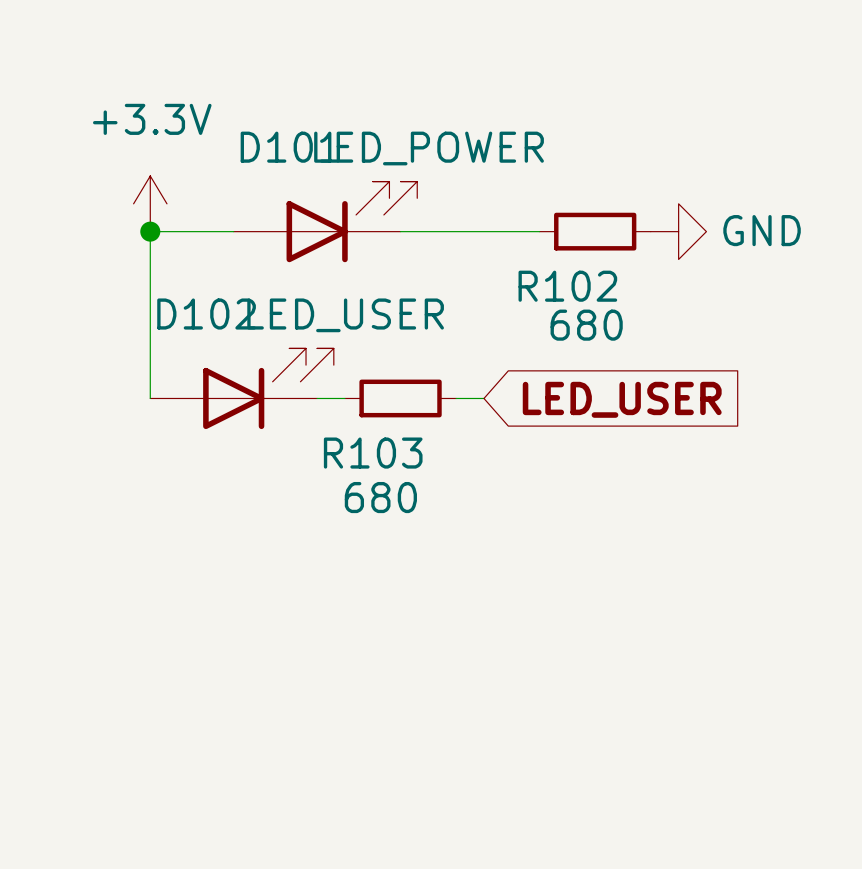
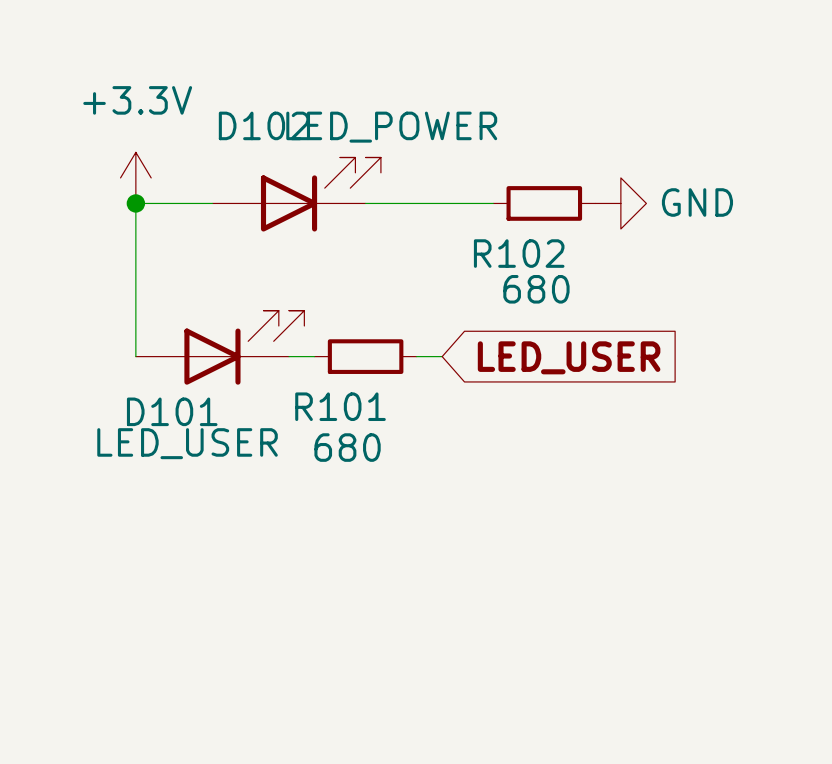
D101 name: D101 (289, 147) -> D102 (264, 125)
D102 name: D102 (206, 314) -> D101 (172, 411)
D102 value position: LED_USER (345, 315) -> LED_USER (187, 443)
R103 name: R103 (373, 453) -> R101 (340, 406)

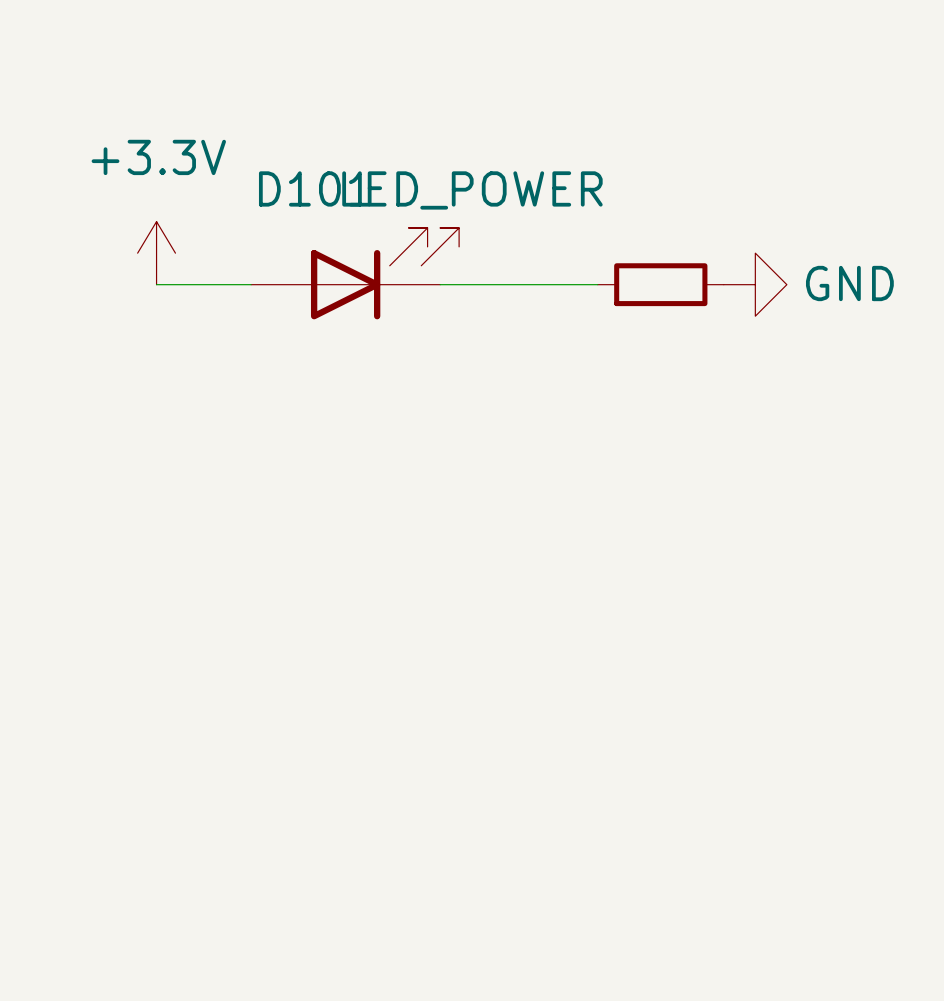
D102 name: D102 (264, 125) -> D101 (314, 188)
wire: (135, 203) (135, 356) -> none
junction: (135, 203) -> none
R102 name: R102 (519, 253) -> none
R102 value: 680 (536, 289) -> none
D101: LED_USER (220, 347) -> none
wire: (289, 356) (314, 356) -> none
R101: 680 (365, 356) -> none
wire: (416, 356) (442, 356) -> none
global label: LED_USER (569, 357) -> none

